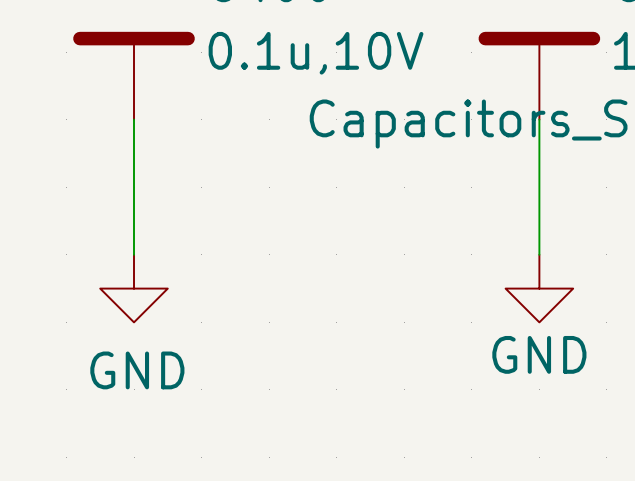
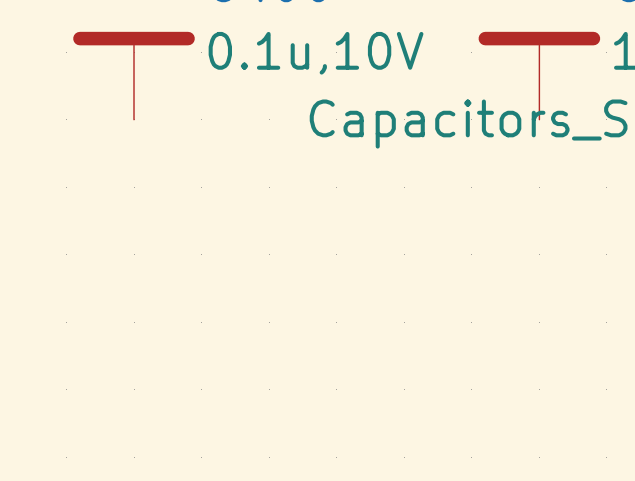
wire: (134, 119) (134, 254) -> none
wire: (539, 119) (539, 254) -> none
power symbol: GND (134, 288) -> none
power symbol: GND (539, 288) -> none

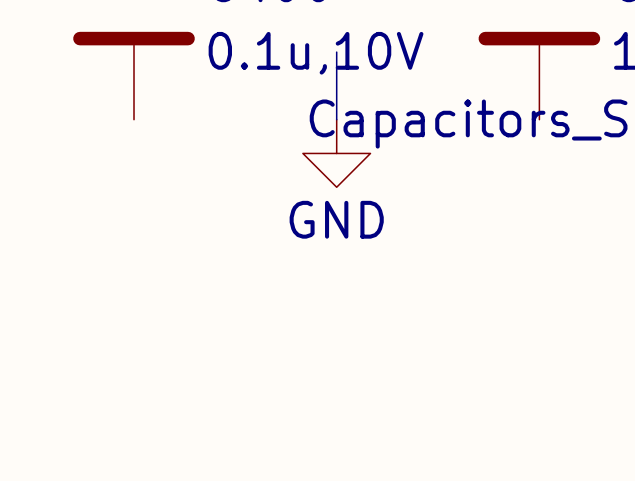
wire: none -> (336, 52) (336, 119)
power symbol: none -> GND (336, 153)

